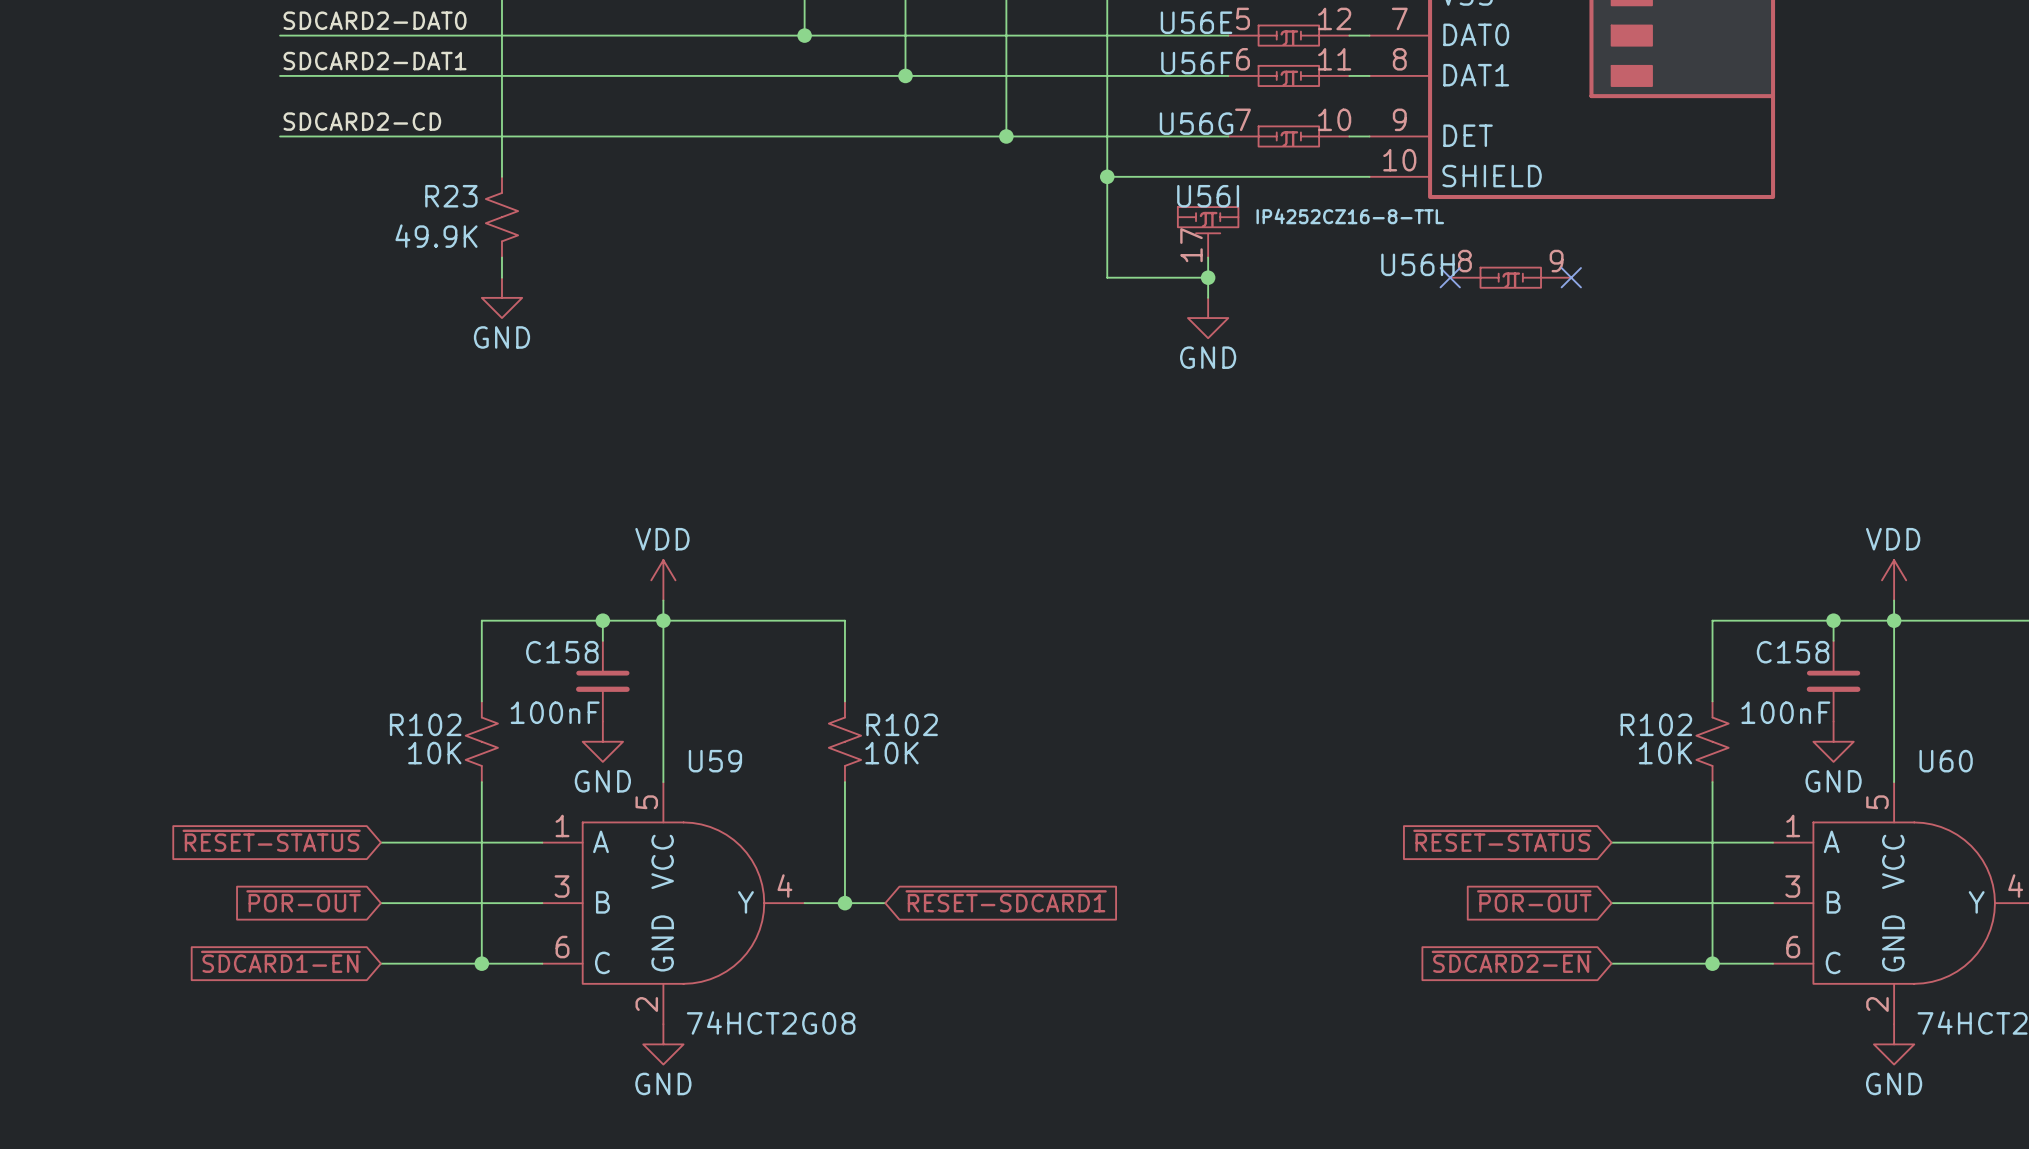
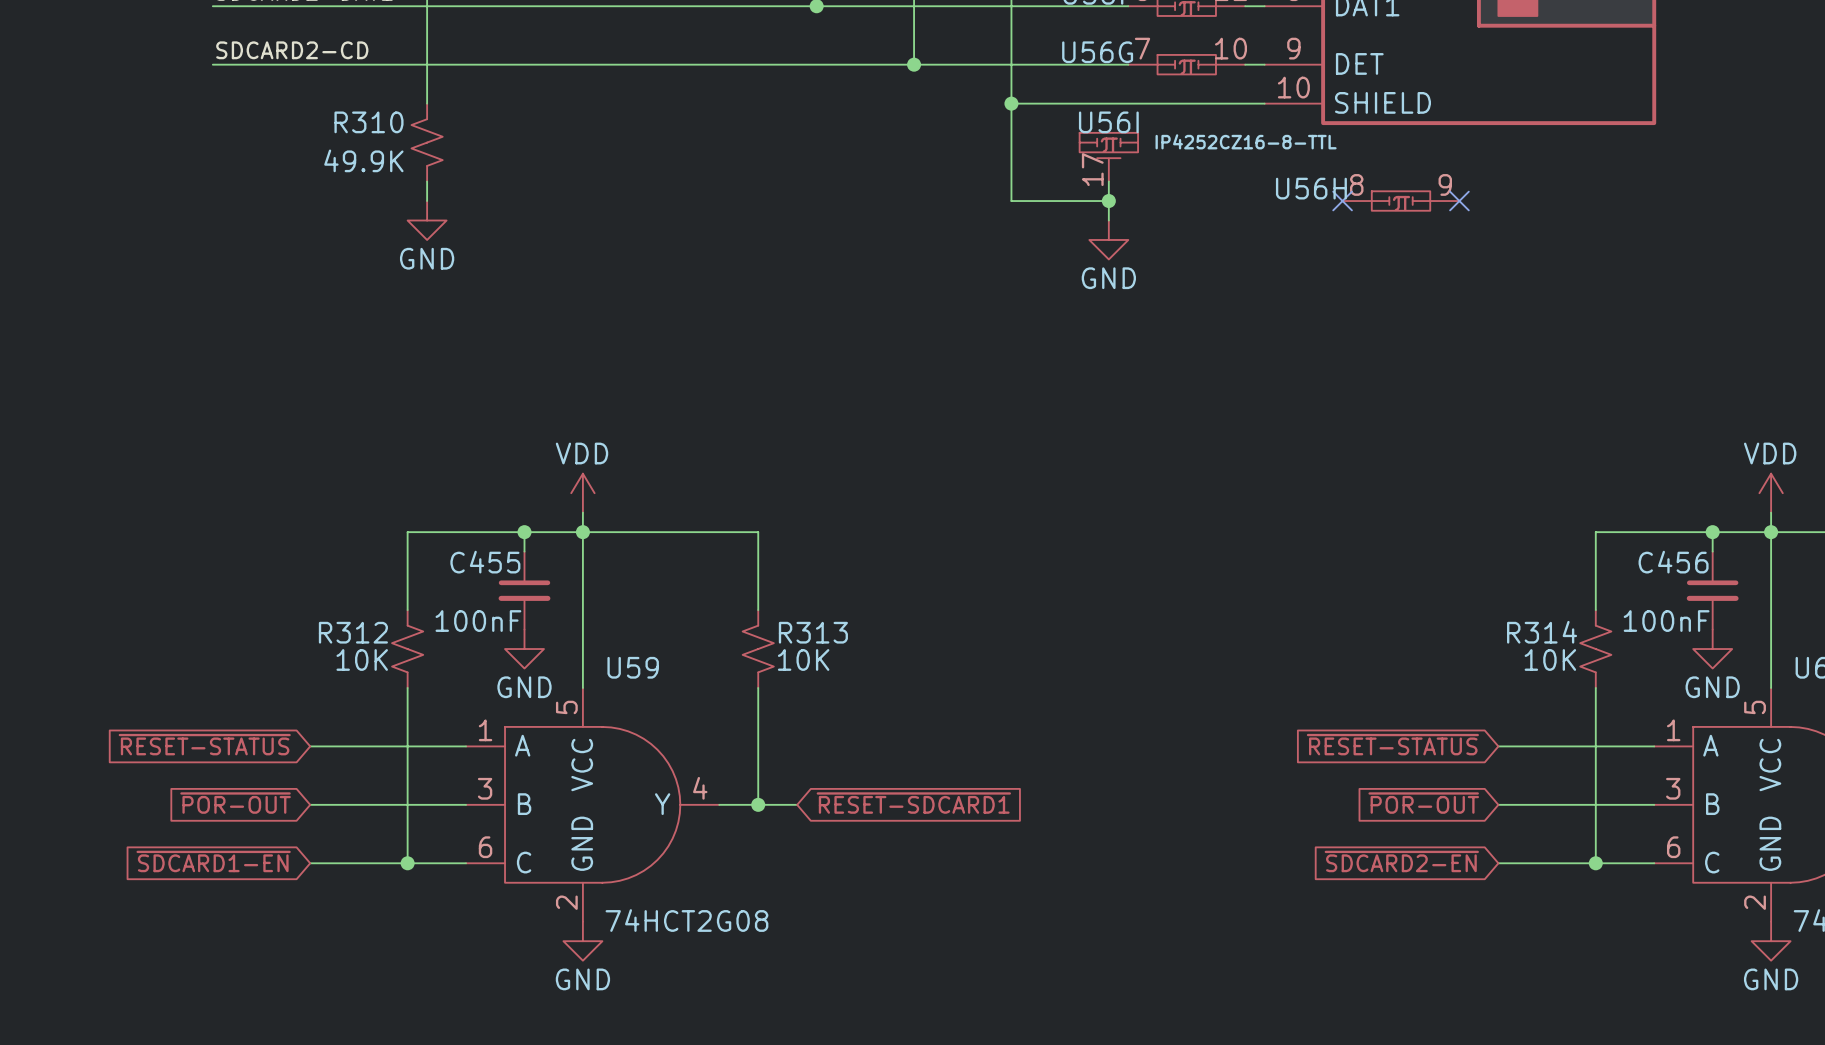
R23 name: R23 (451, 196) -> R310 (368, 122)
C158 name: C158 (562, 652) -> C455 (485, 562)
C158 name: C158 (1793, 652) -> C456 (1673, 562)
R102 name: R102 (425, 724) -> R312 (353, 632)
R102 name: R102 (902, 724) -> R313 (813, 632)
R102 name: R102 (1656, 724) -> R314 (1542, 632)

